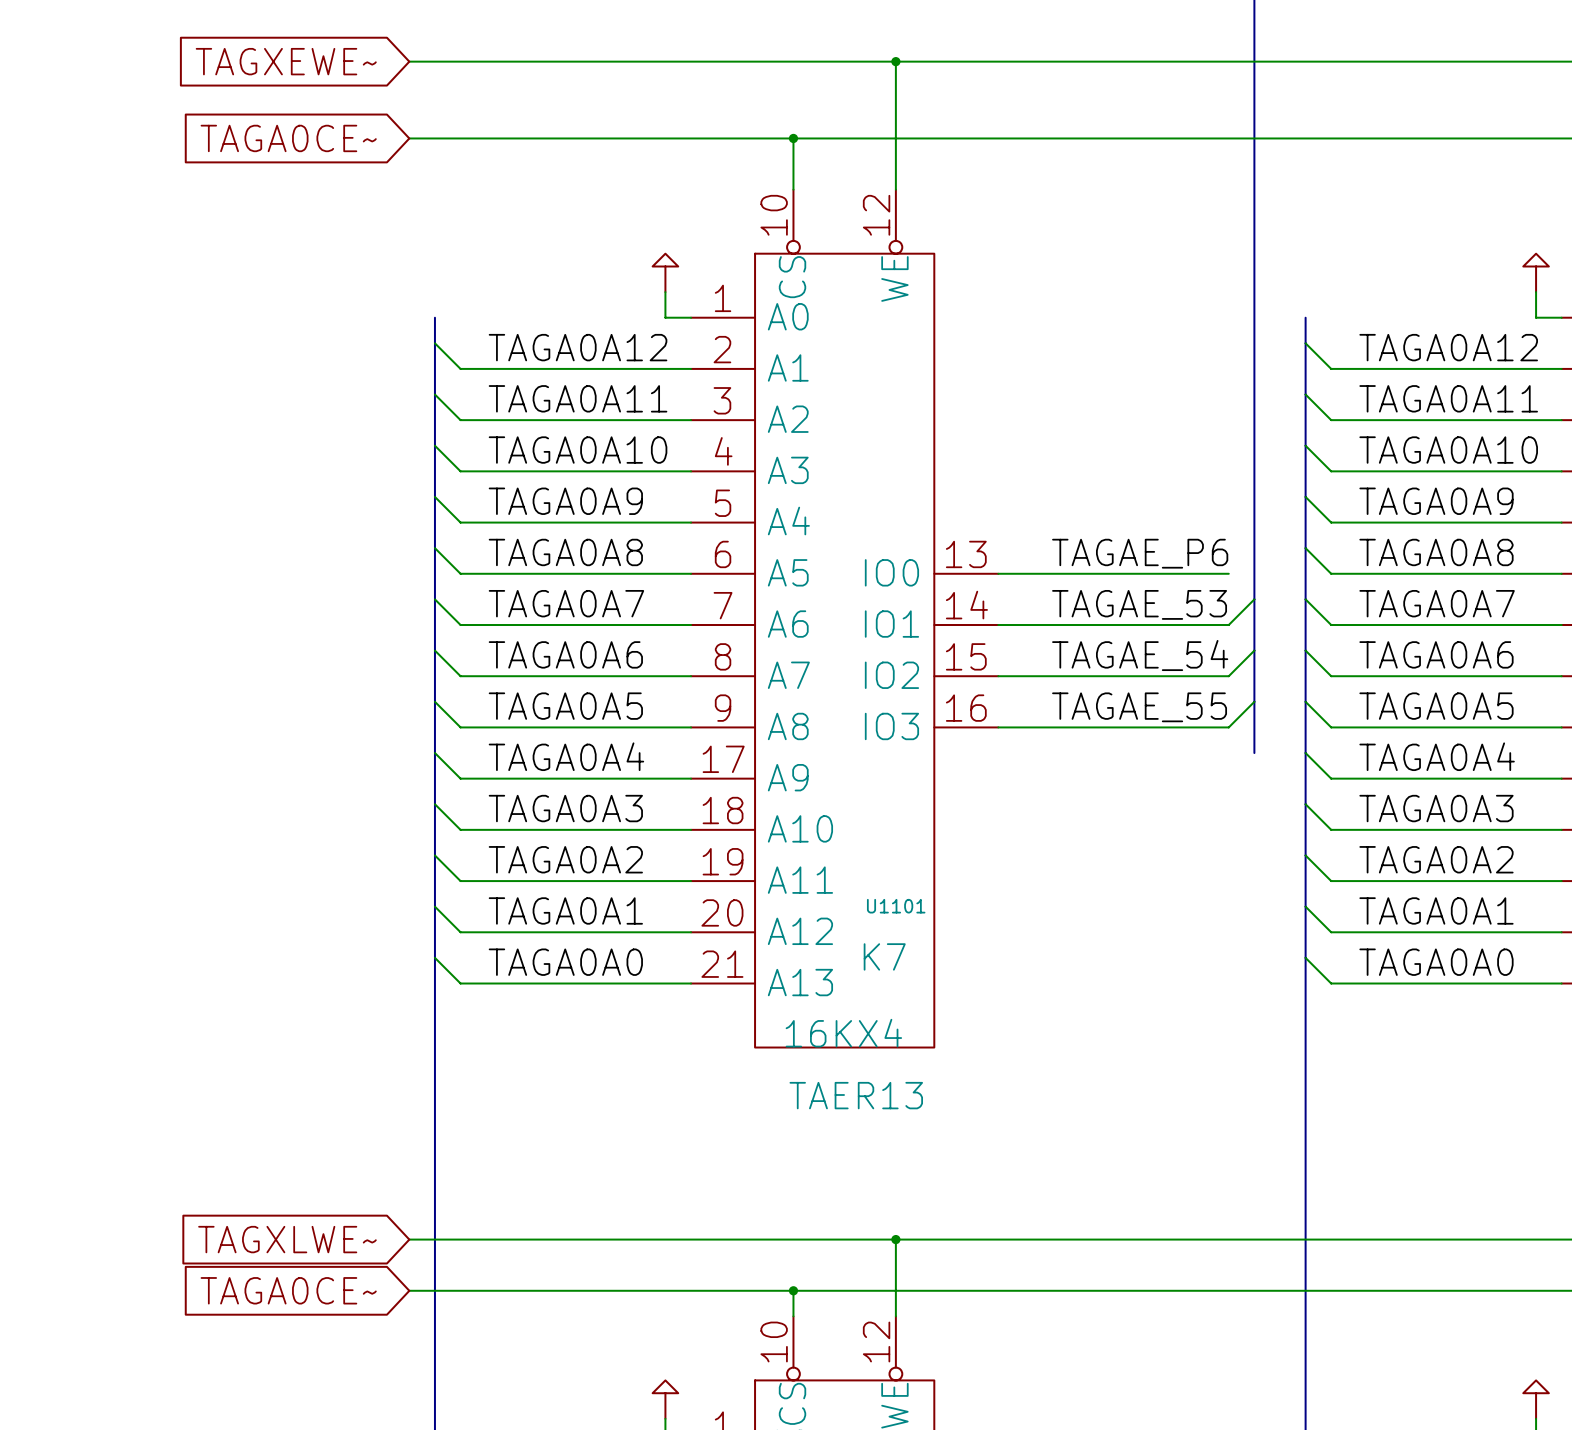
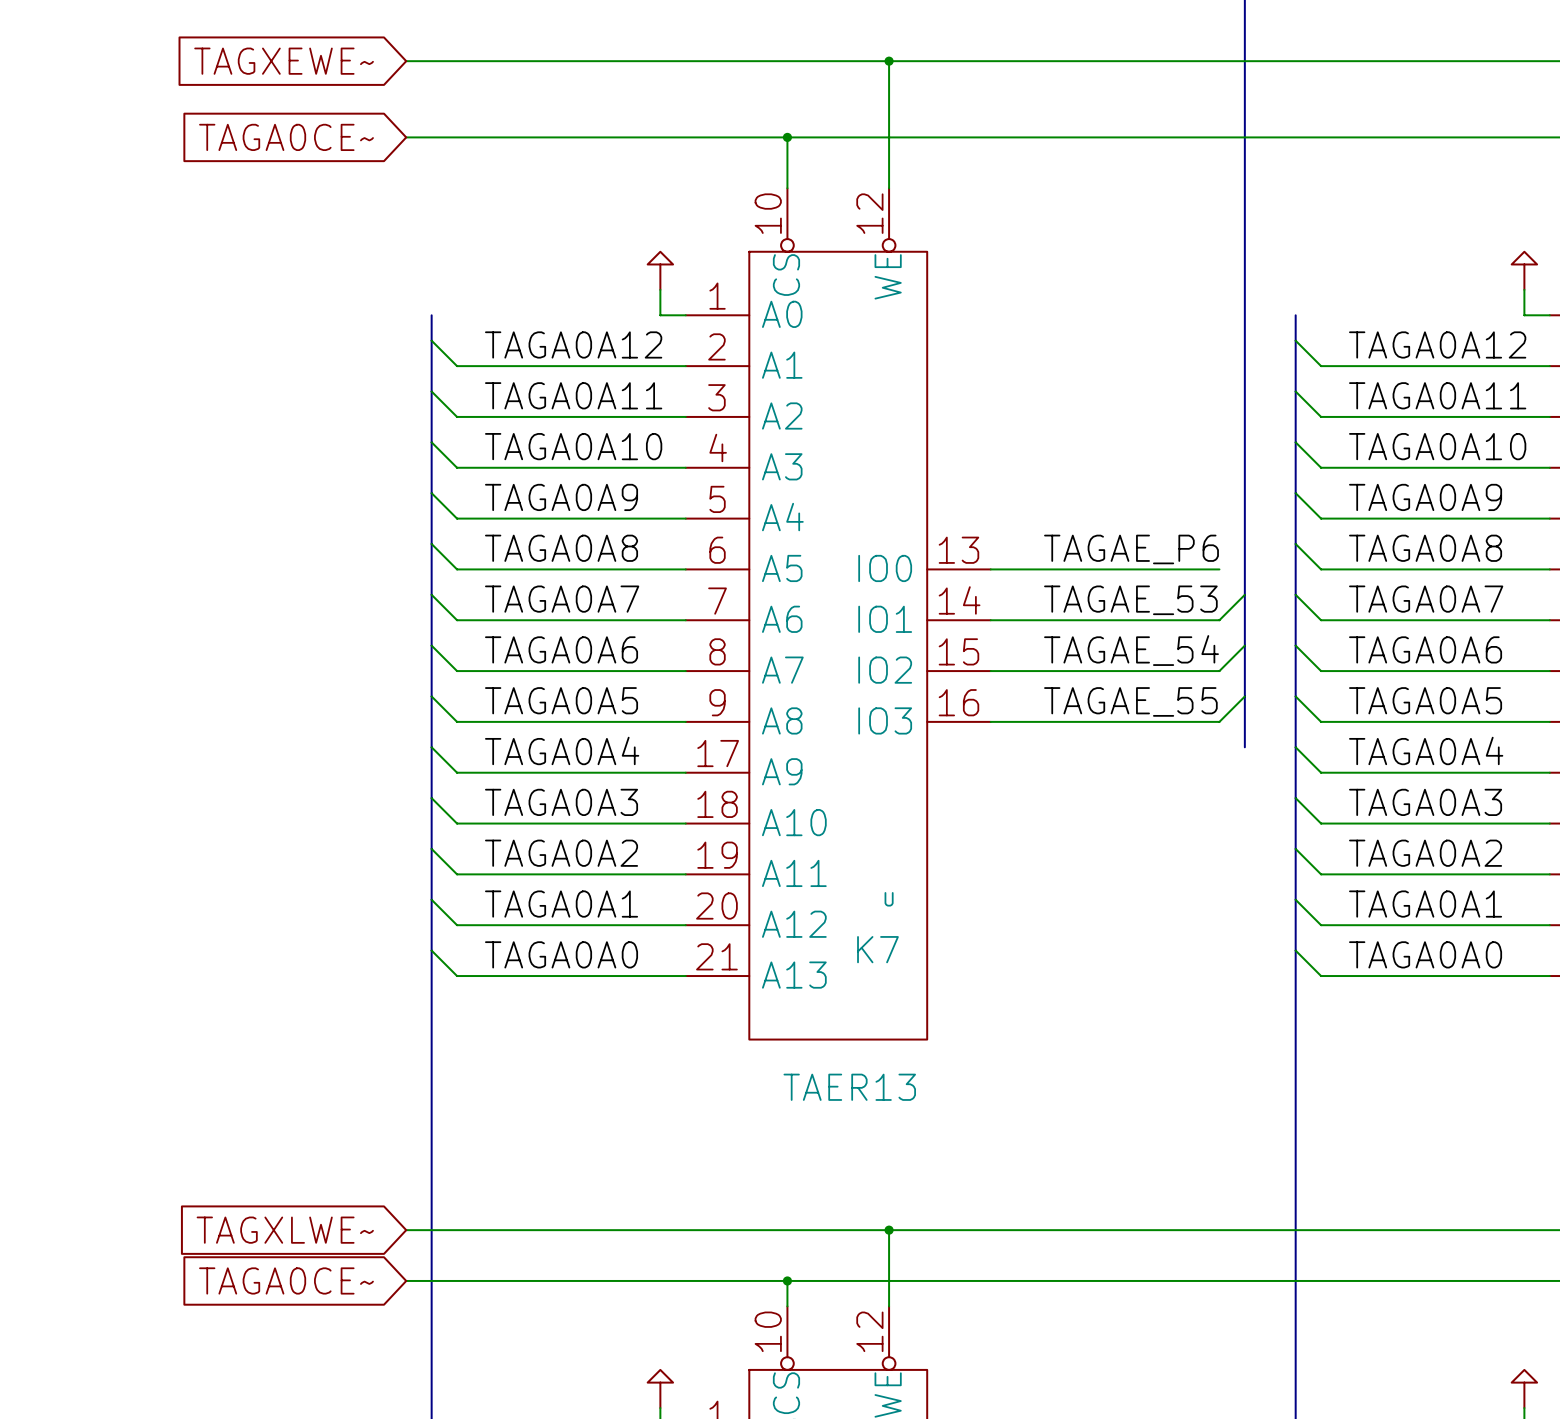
U1101 name: U1101 (896, 906) -> U (889, 899)
U1101 value: 16KX4 (843, 1033) -> none

